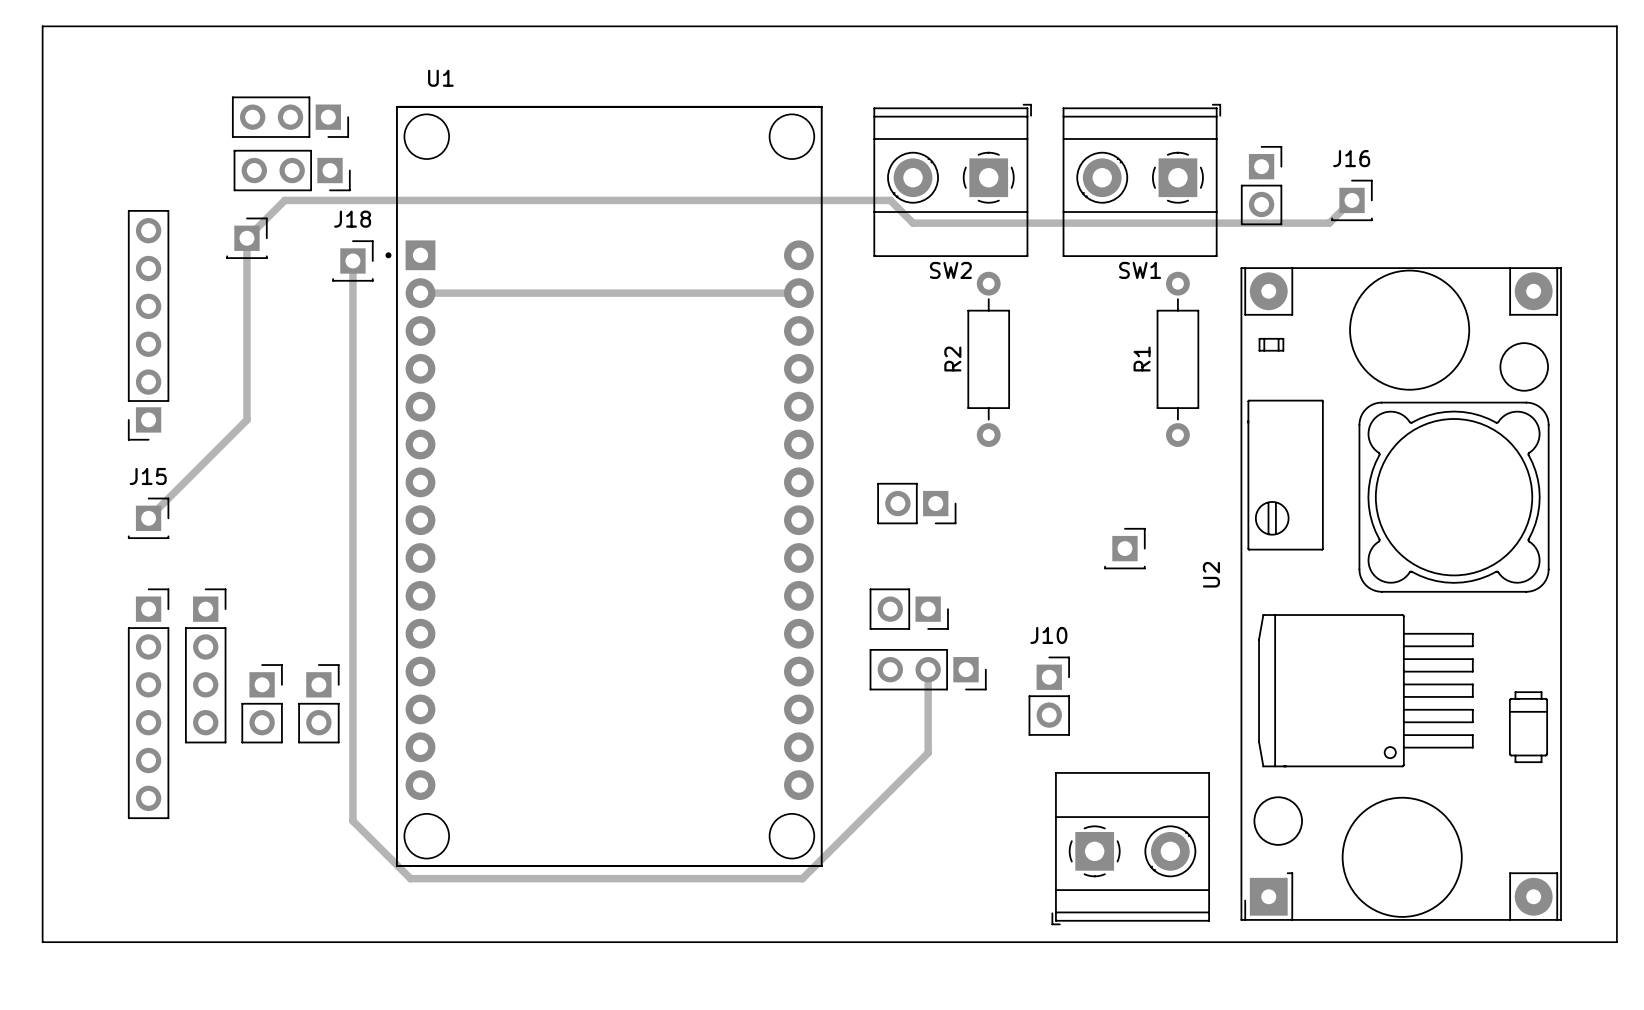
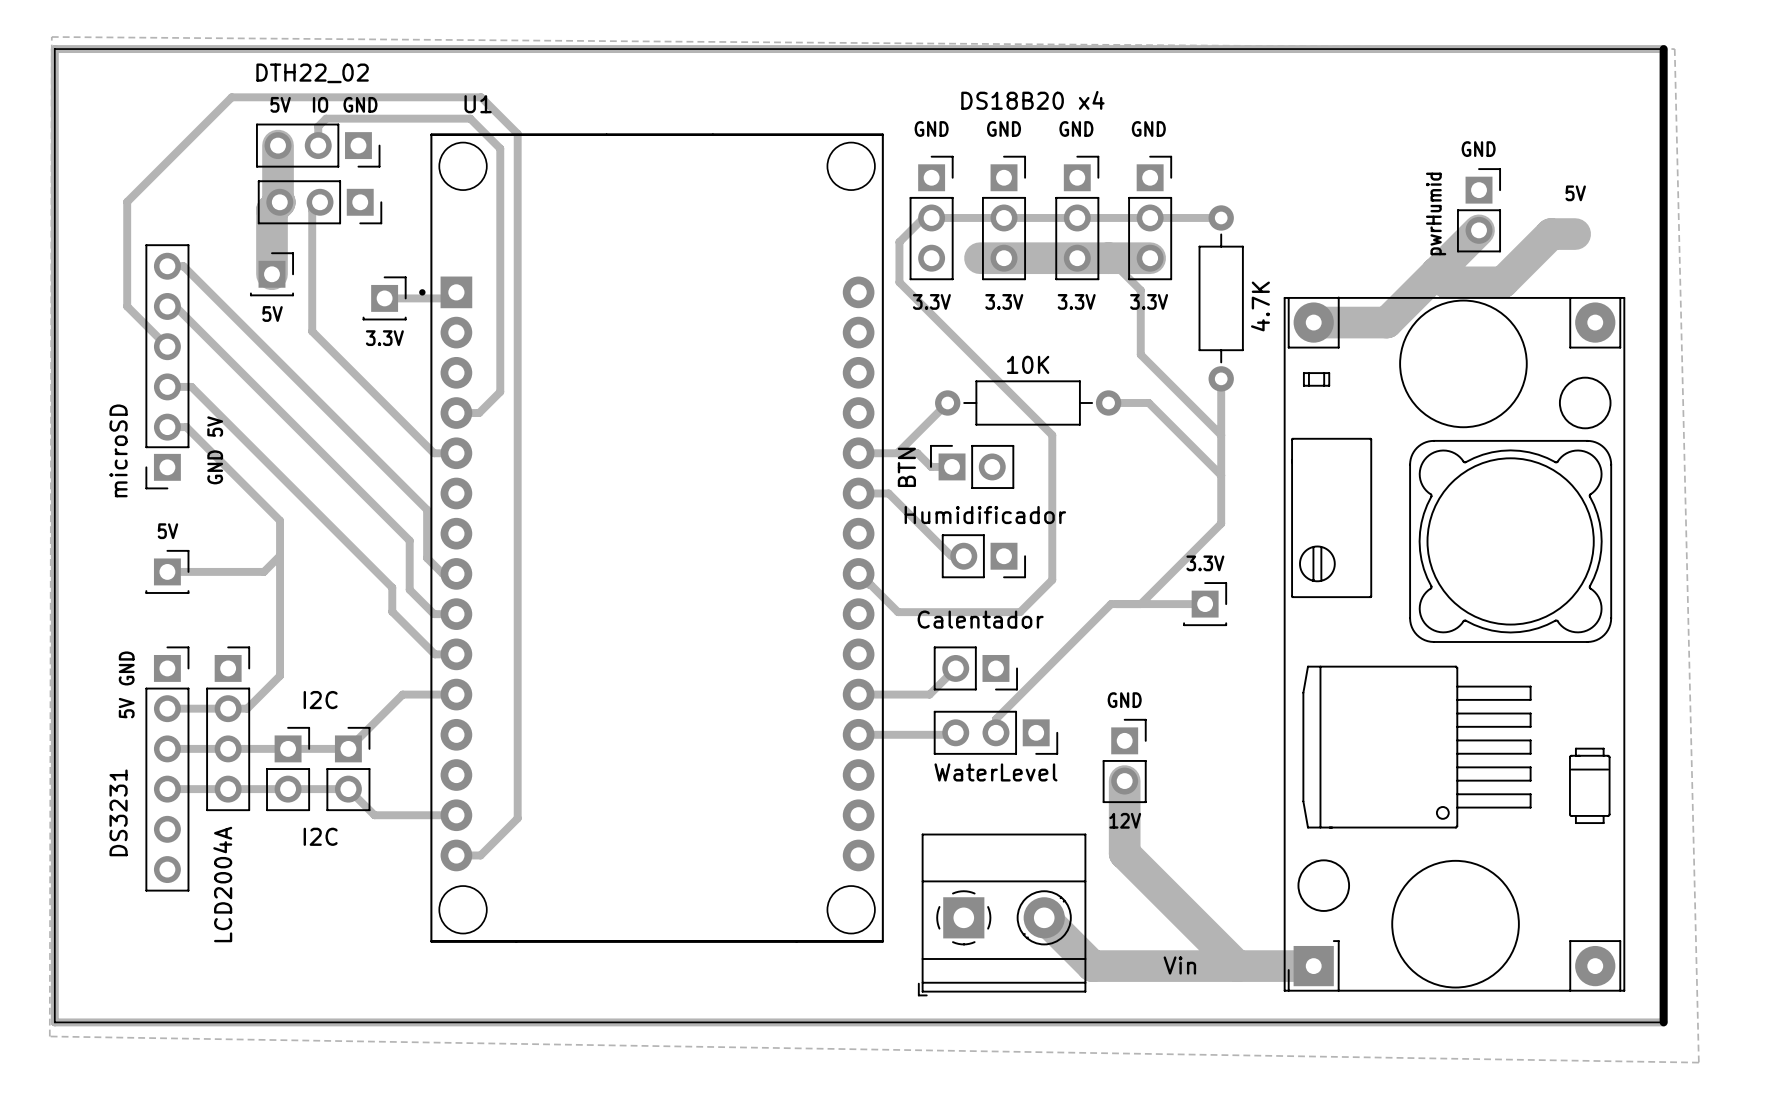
zone outline: none -> (51, 36) (1674, 49) (1698, 1062) (49, 1036) (51, 36)
track: none -> (54, 49) (1663, 49) (1663, 1022) (54, 1022) (54, 49)
board edge: (1556, 26) (1616, 26) (1616, 942) (1556, 942) -> (1663, 49) (1663, 1022)
part value: none -> DTH22_02 (312, 73)
text: none -> DS18B20 x4 (1032, 100)
text: none -> 5V (280, 104)
text: none -> IO (320, 104)
text: none -> GND (360, 104)
text: none -> GND (931, 128)
text: none -> GND (1004, 128)
text: none -> GND (1076, 128)
text: none -> GND (1148, 128)
track: none -> (278, 145) (278, 200) (279, 202) (271, 210) (271, 274)
track: none -> (318, 145) (318, 126) (326, 118) (470, 118) (500, 148) (500, 391) (479, 413) (456, 413)
text: none -> GND (1478, 149)
text: none -> 5V (1575, 193)
track: none -> (320, 202) (312, 210) (312, 331) (434, 453) (456, 453)
SW2: (952, 180) -> none
SW1: (1141, 180) -> none
text: none -> pwrHumid (1436, 213)
track: none -> (923, 217) (899, 242) (899, 282) (1052, 435) (1052, 579) (1020, 612) (898, 612) (858, 573)
track: none -> (931, 217) (1221, 217)
part: none -> (931, 217)
part: none -> (1004, 217)
part: none -> (1077, 217)
part: none -> (1150, 217)
part position: (1261, 185) -> (1479, 210)
track: none -> (1479, 230) (1386, 322) (1313, 322)
track: (1352, 200) (1329, 223) (1073, 223) -> none
J16: (1352, 200) -> none
track: none -> (1575, 234) (1551, 234) (1502, 282) (1446, 282) (1436, 272)
J18 name: J18 (352, 219) -> none
track: (913, 223) (890, 200) (284, 200) (246, 238) (246, 419) (148, 518) -> (280, 555) (263, 571) (167, 571)
track width: thin (913, 223) (1073, 223) -> thick (980, 258) (1150, 258)
track: none -> (1108, 258) (1140, 290) (1140, 354) (1221, 435)
track: none -> (167, 266) (183, 266) (427, 509) (427, 558) (442, 573) (456, 573)
track: (352, 260) (352, 821) (410, 878) (802, 878) (928, 752) (928, 669) -> (384, 298) (450, 298)
part: none -> 4.7K (1221, 298)
text: none -> 3.3V (931, 301)
text: none -> 3.3V (1004, 301)
text: none -> 3.3V (1076, 301)
text: none -> 3.3V (1149, 301)
track: none -> (175, 306) (409, 540) (409, 589) (434, 614) (456, 614)
text: none -> 5V (272, 314)
track: (420, 293) (798, 293) -> none
text: none -> 3.3V (384, 338)
track: none -> (167, 346) (127, 306) (127, 201) (231, 97) (481, 97) (517, 133) (517, 818) (480, 855) (456, 855)
track: none -> (1221, 378) (1221, 523) (1140, 604)
track: none -> (167, 386) (191, 386) (392, 587) (392, 611) (434, 654) (456, 654)
track: none -> (947, 402) (899, 453)
part: none -> 10K (1028, 402)
R2: (988, 359) -> none
track: none -> (1108, 402) (1148, 402) (1221, 475)
R1: (1177, 359) -> none
text: none -> 5V (215, 426)
track: none -> (167, 427) (186, 427) (280, 520) (280, 675) (247, 708) (167, 708)
part value: none -> microSD (118, 450)
track: none -> (858, 453) (917, 453) (931, 466) (952, 466)
text: none -> GND (215, 467)
text: none -> BTN (906, 467)
part: none -> (972, 466)
track: none -> (858, 493) (888, 493) (951, 556)
part value: none -> Humidificador (985, 515)
J15 name: J15 (148, 476) -> none
text: none -> 5V (167, 531)
text: none -> 3.3V (1205, 563)
track: none -> (1205, 604) (1111, 604) (995, 719) (995, 732)
part value: none -> Calentador (980, 619)
part: none -> (1454, 644)
U2: (1401, 593) -> none
text: none -> GND (126, 668)
track: none -> (955, 668) (929, 694) (858, 694)
track: none -> (456, 694) (402, 694) (348, 748) (167, 748)
J10 name: J10 (1048, 635) -> none
part value: none -> I2C (320, 700)
text: none -> GND (1124, 700)
text: none -> 5V (126, 708)
track: none -> (858, 734) (953, 734)
part value: none -> WaterLevel (995, 772)
track: none -> (1124, 781) (1124, 853) (1237, 966)
track: none -> (167, 789) (348, 789) (374, 815) (456, 815)
part value: none -> DS3231 (118, 812)
text: none -> 12V (1125, 820)
part value: none -> I2C (320, 836)
part value: none -> LCD2004A (222, 884)
part: none -> Vin (1002, 914)
track: none -> (1044, 917) (1092, 966) (1313, 966)
part: (1130, 848) -> none

